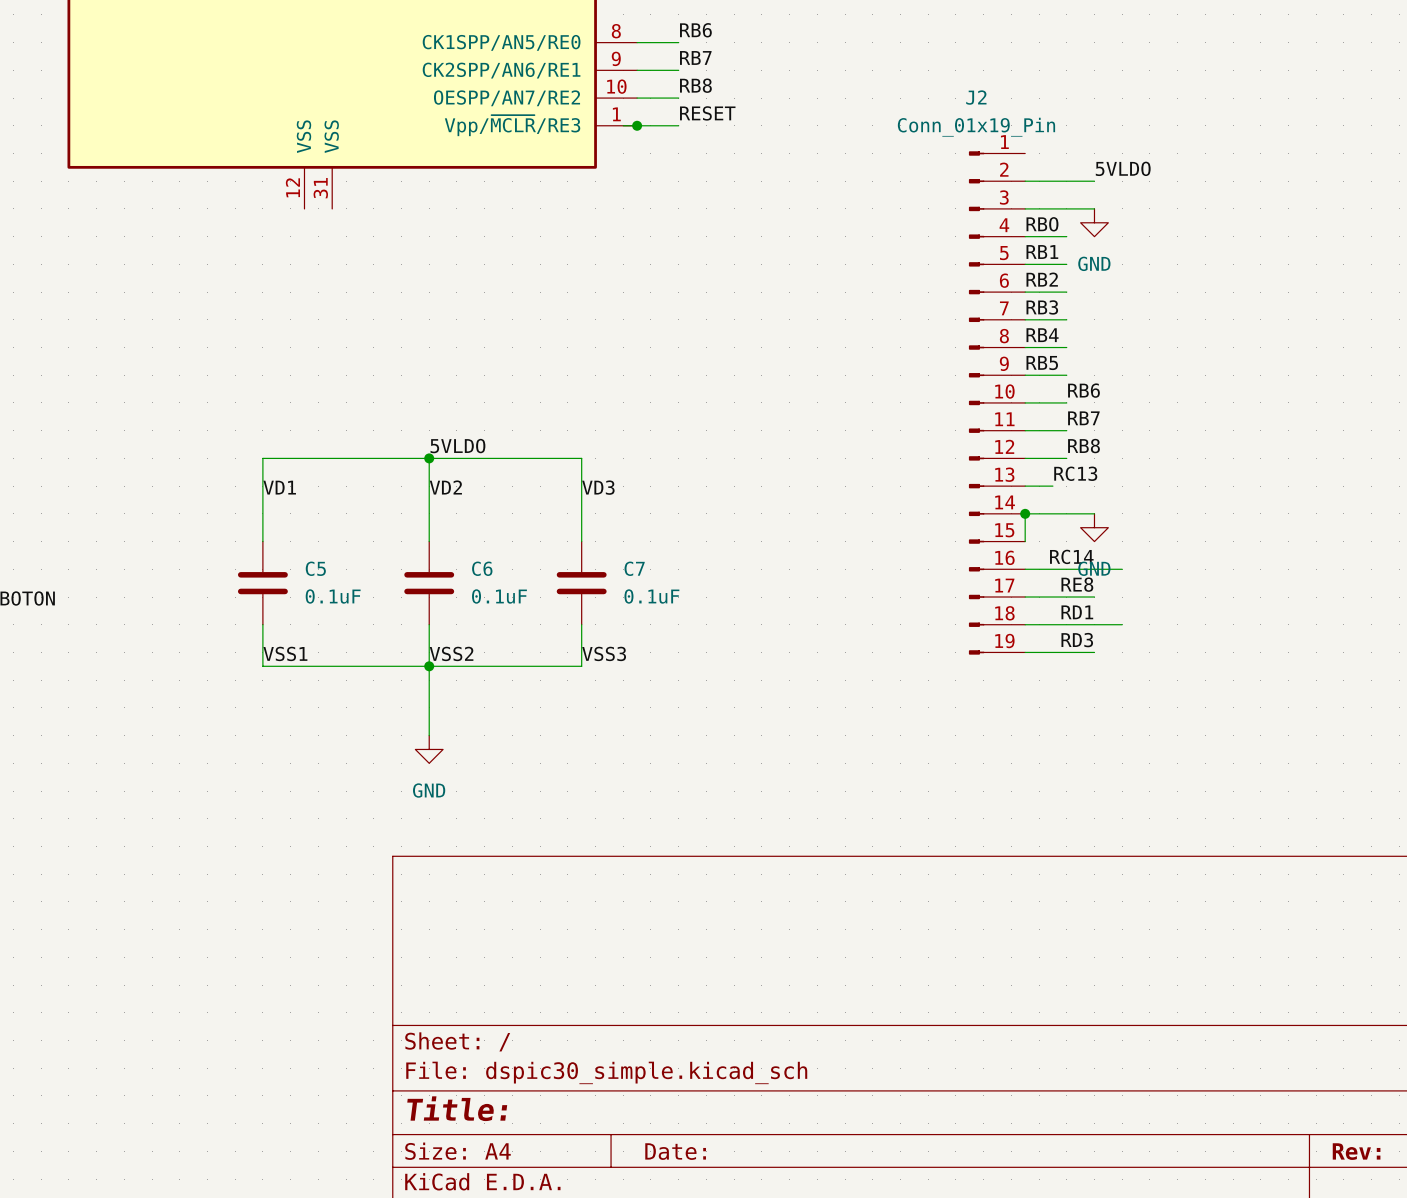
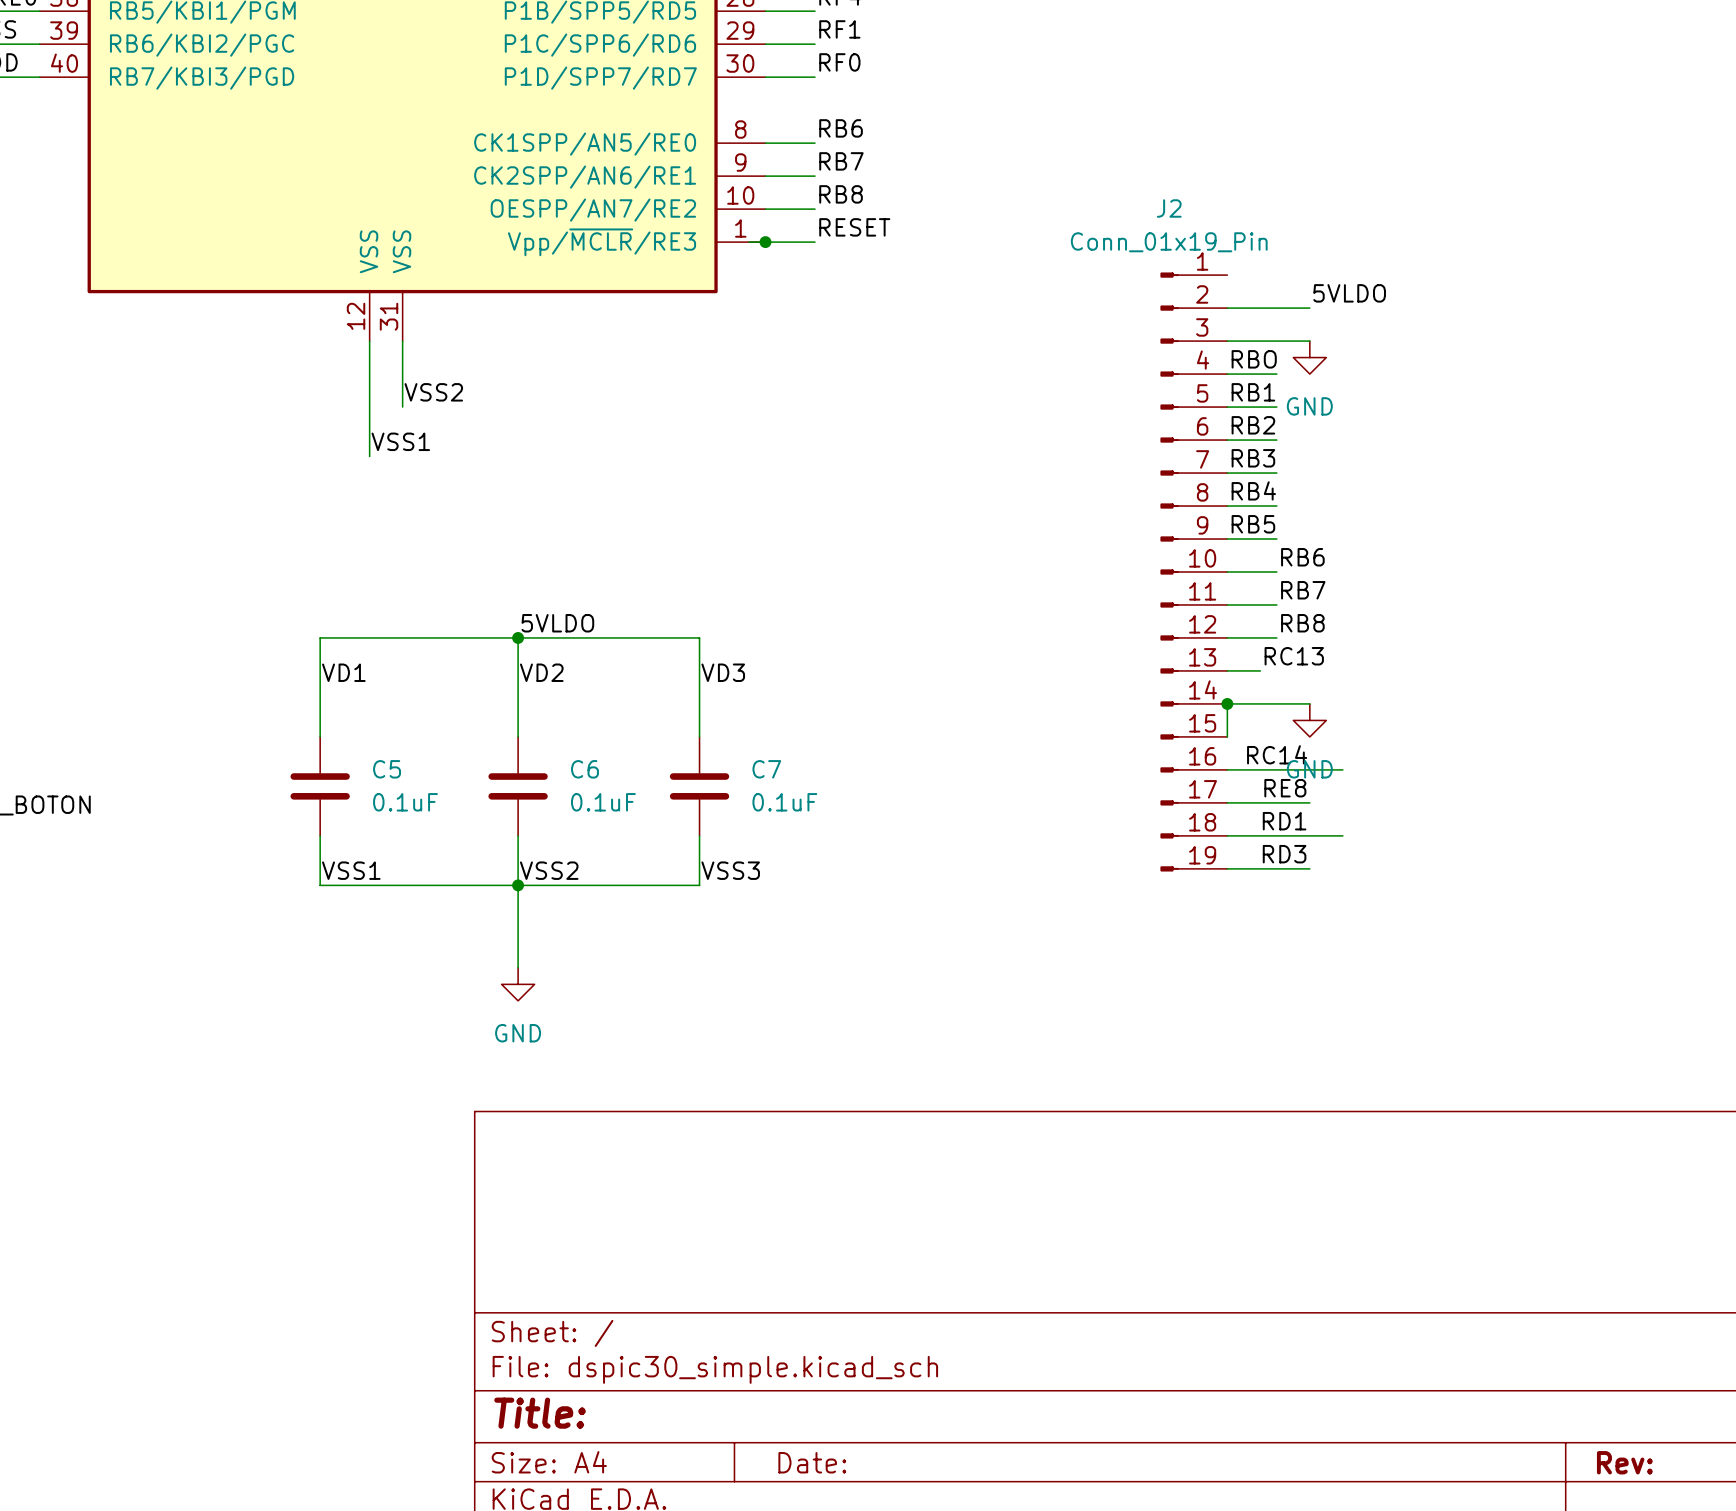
wire: none -> (369, 341) (369, 456)
wire: none -> (402, 341) (402, 407)
label: none -> VSS2 (433, 392)
label: none -> VSS1 (400, 441)

